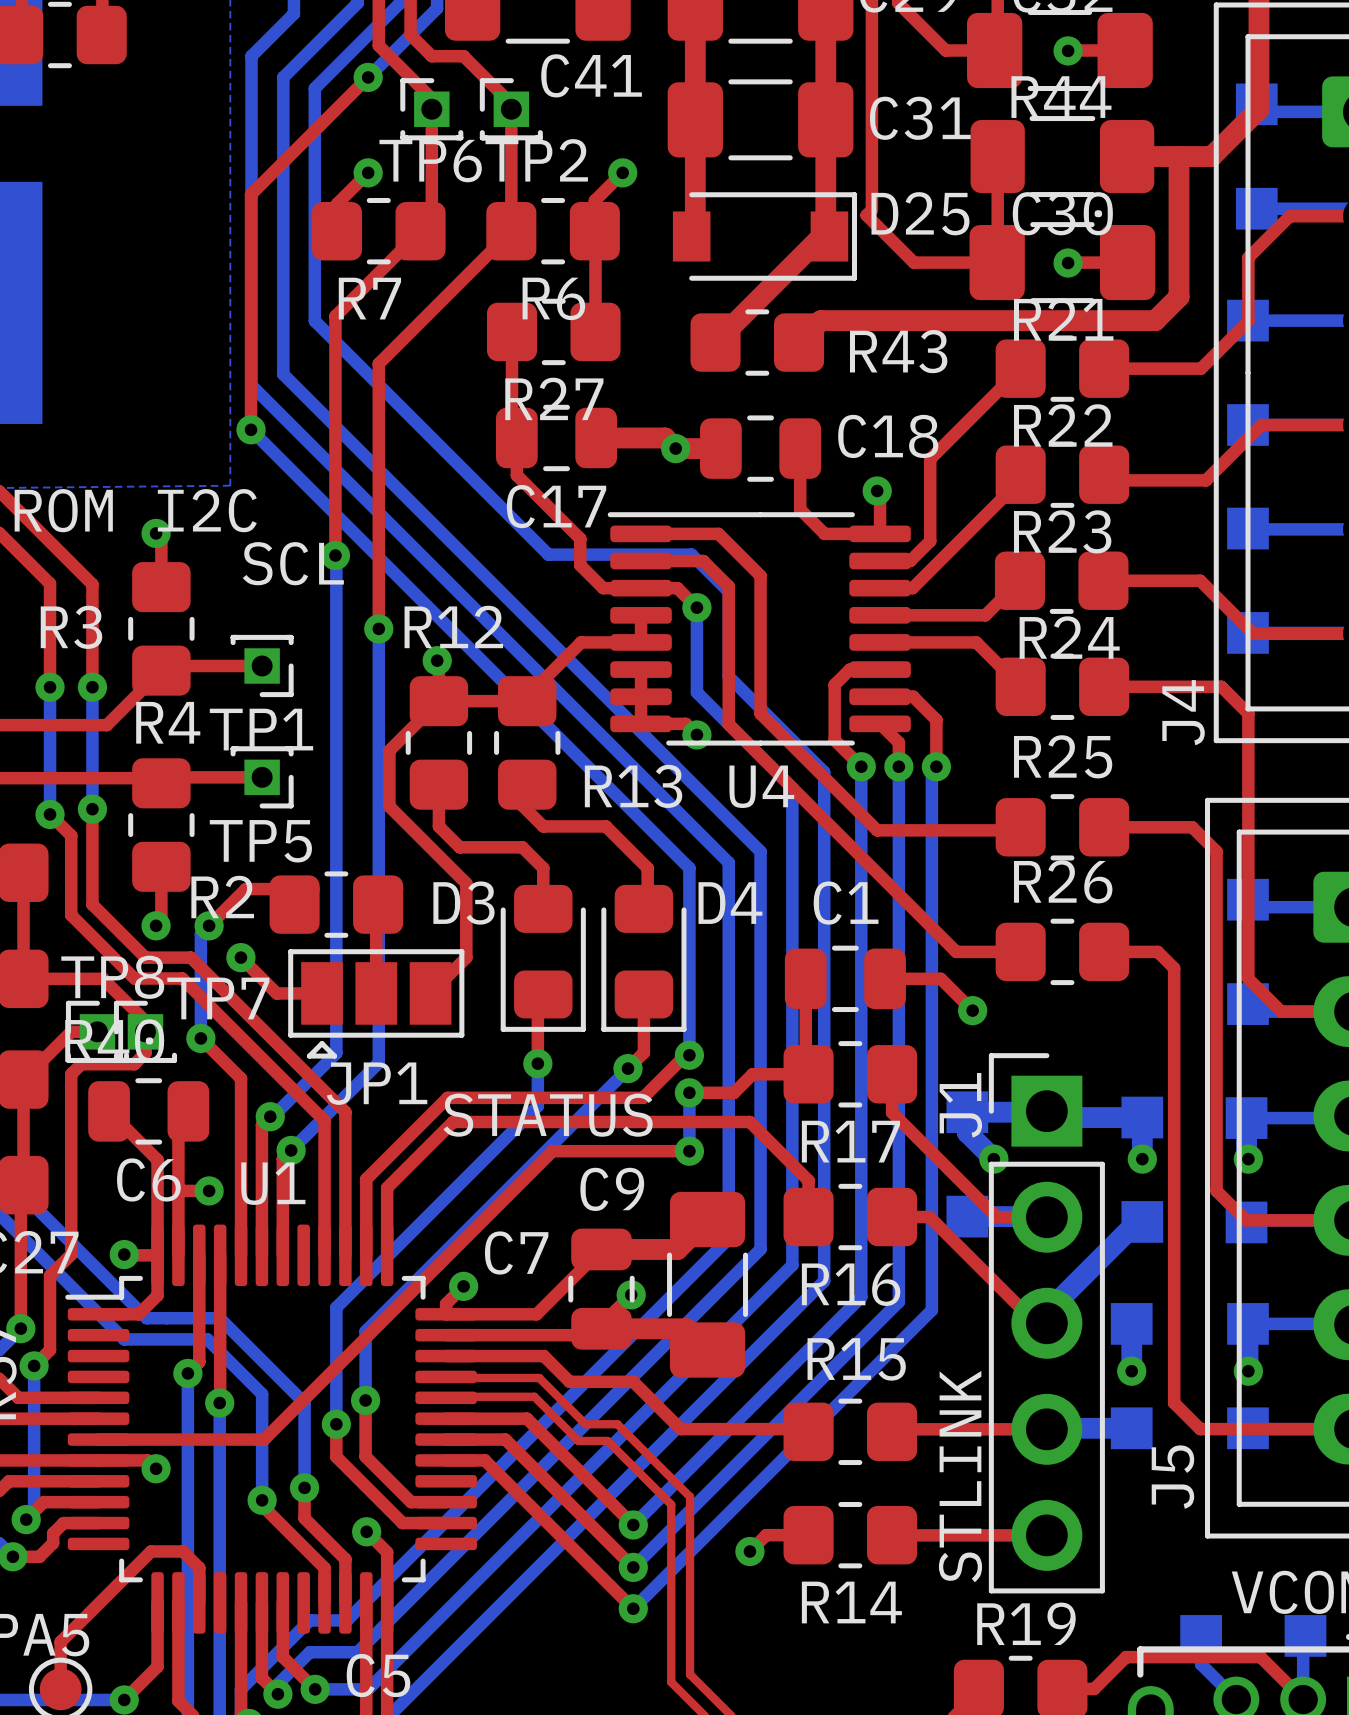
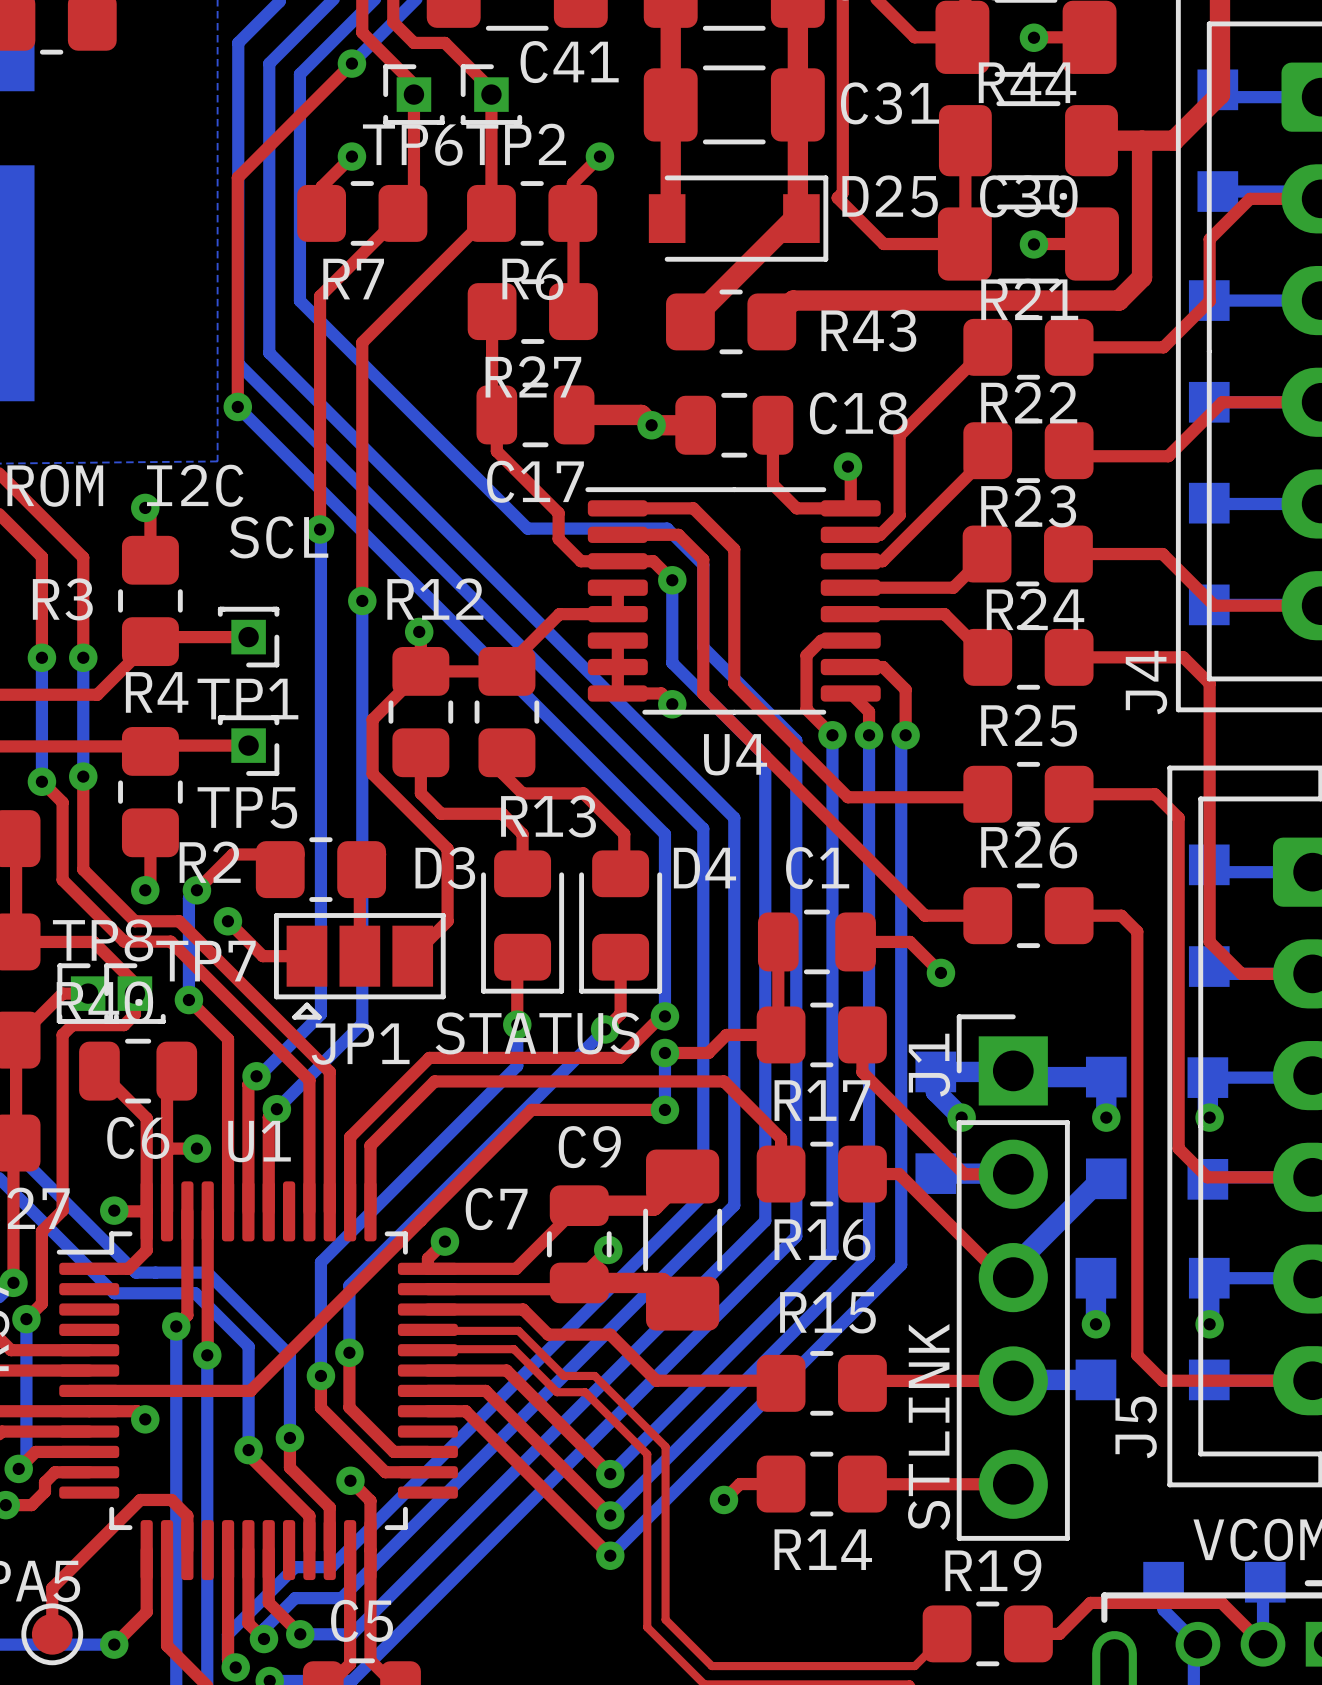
R13 name position: R13 (633, 786) -> R13 (548, 816)
text position: STATUS (548, 1115) -> STATUS (537, 1033)

